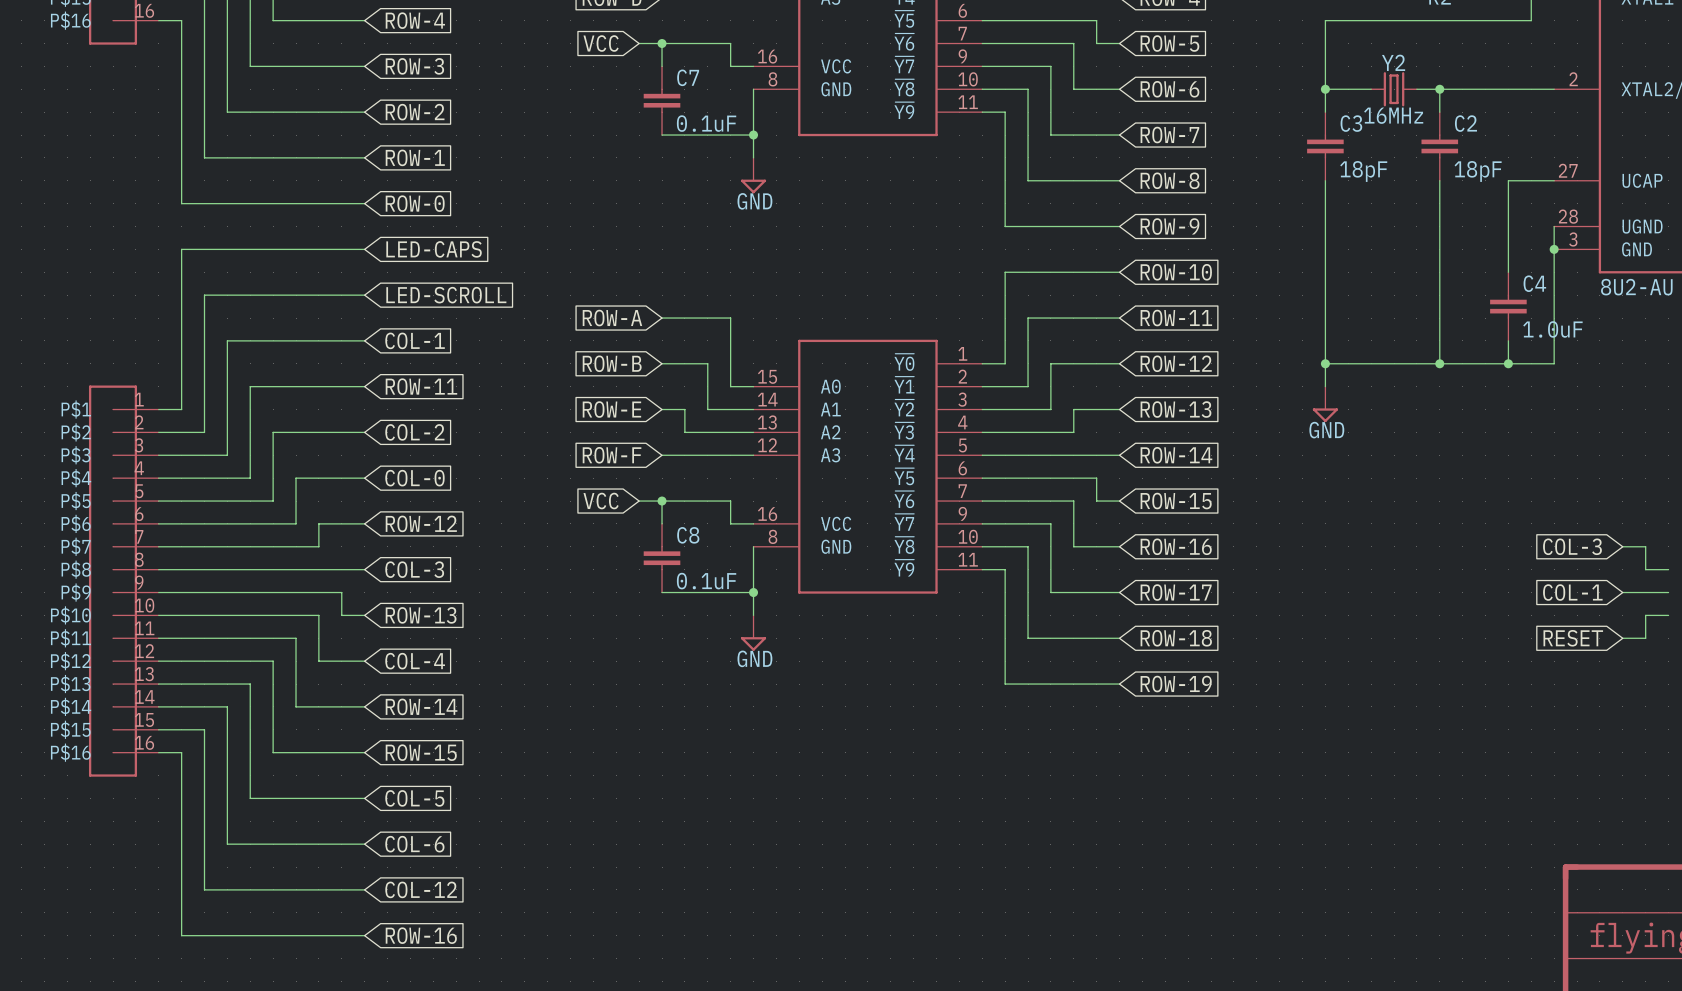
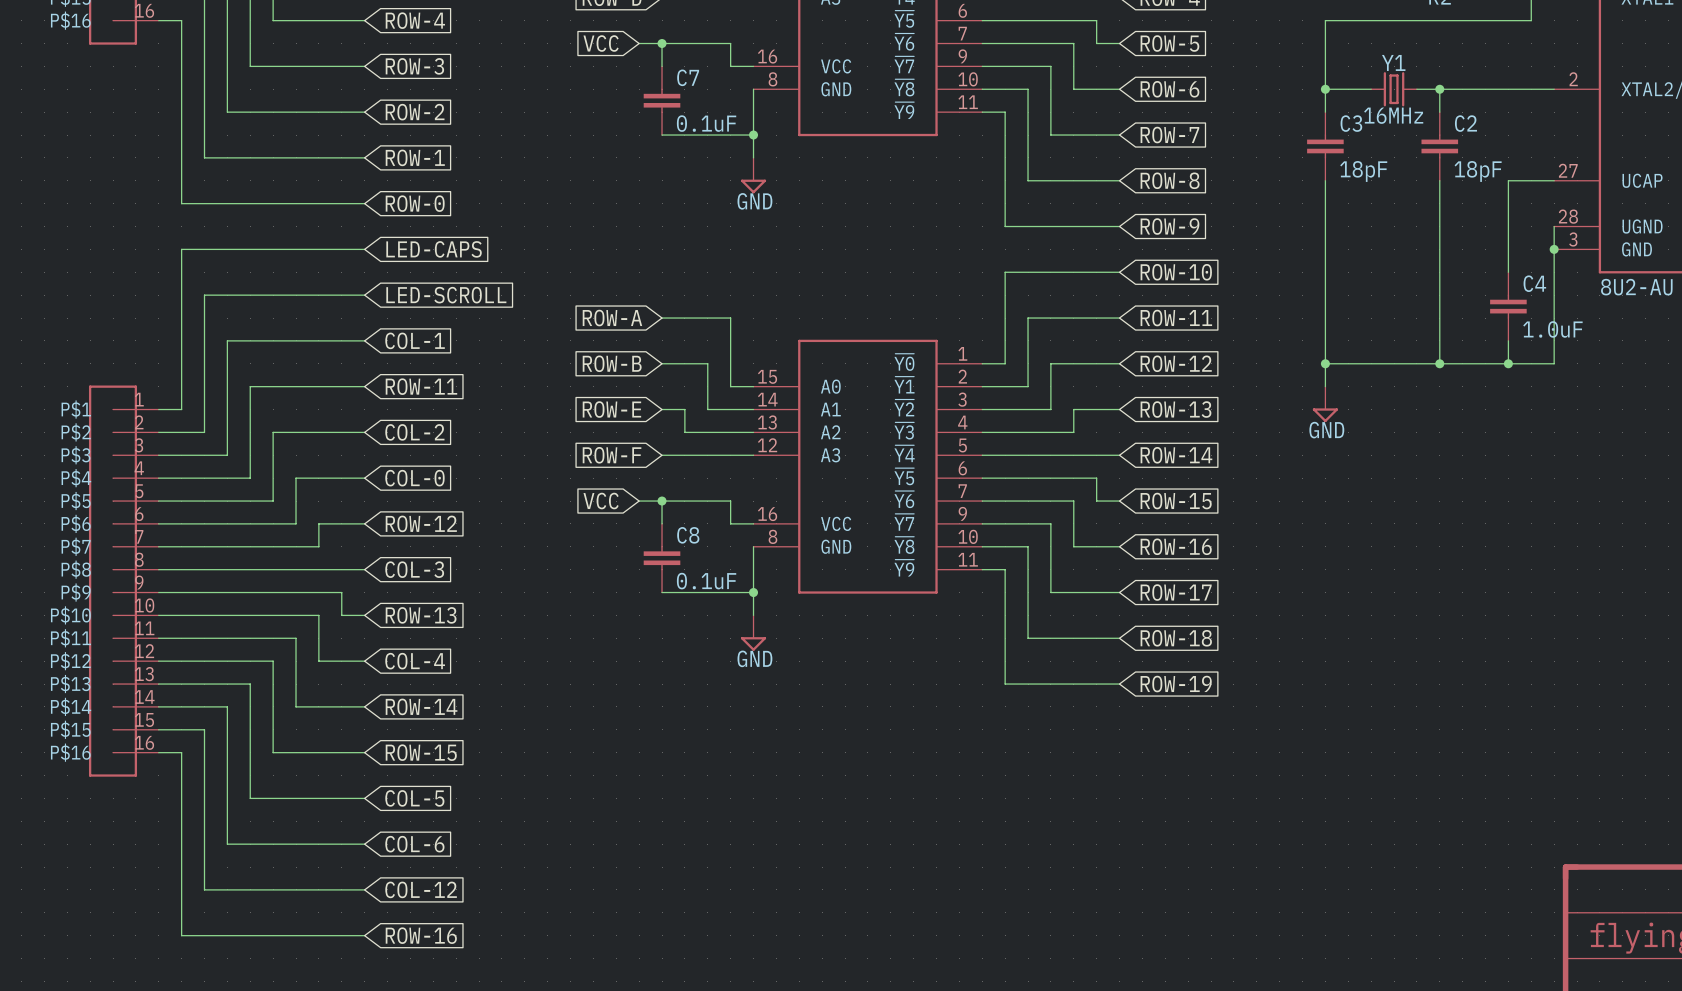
Y2 name: Y2 (1393, 62) -> Y1 (1393, 62)
global label: COL-3 (1572, 546) -> none
wire: (1622, 546) (1645, 546) (1645, 569) (1668, 569) -> none
global label: COL-1 (1572, 592) -> none
wire: (1622, 592) (1668, 592) -> none
wire: (1668, 615) (1645, 615) (1645, 638) (1622, 638) -> none
global label: RESET (1573, 638) -> none

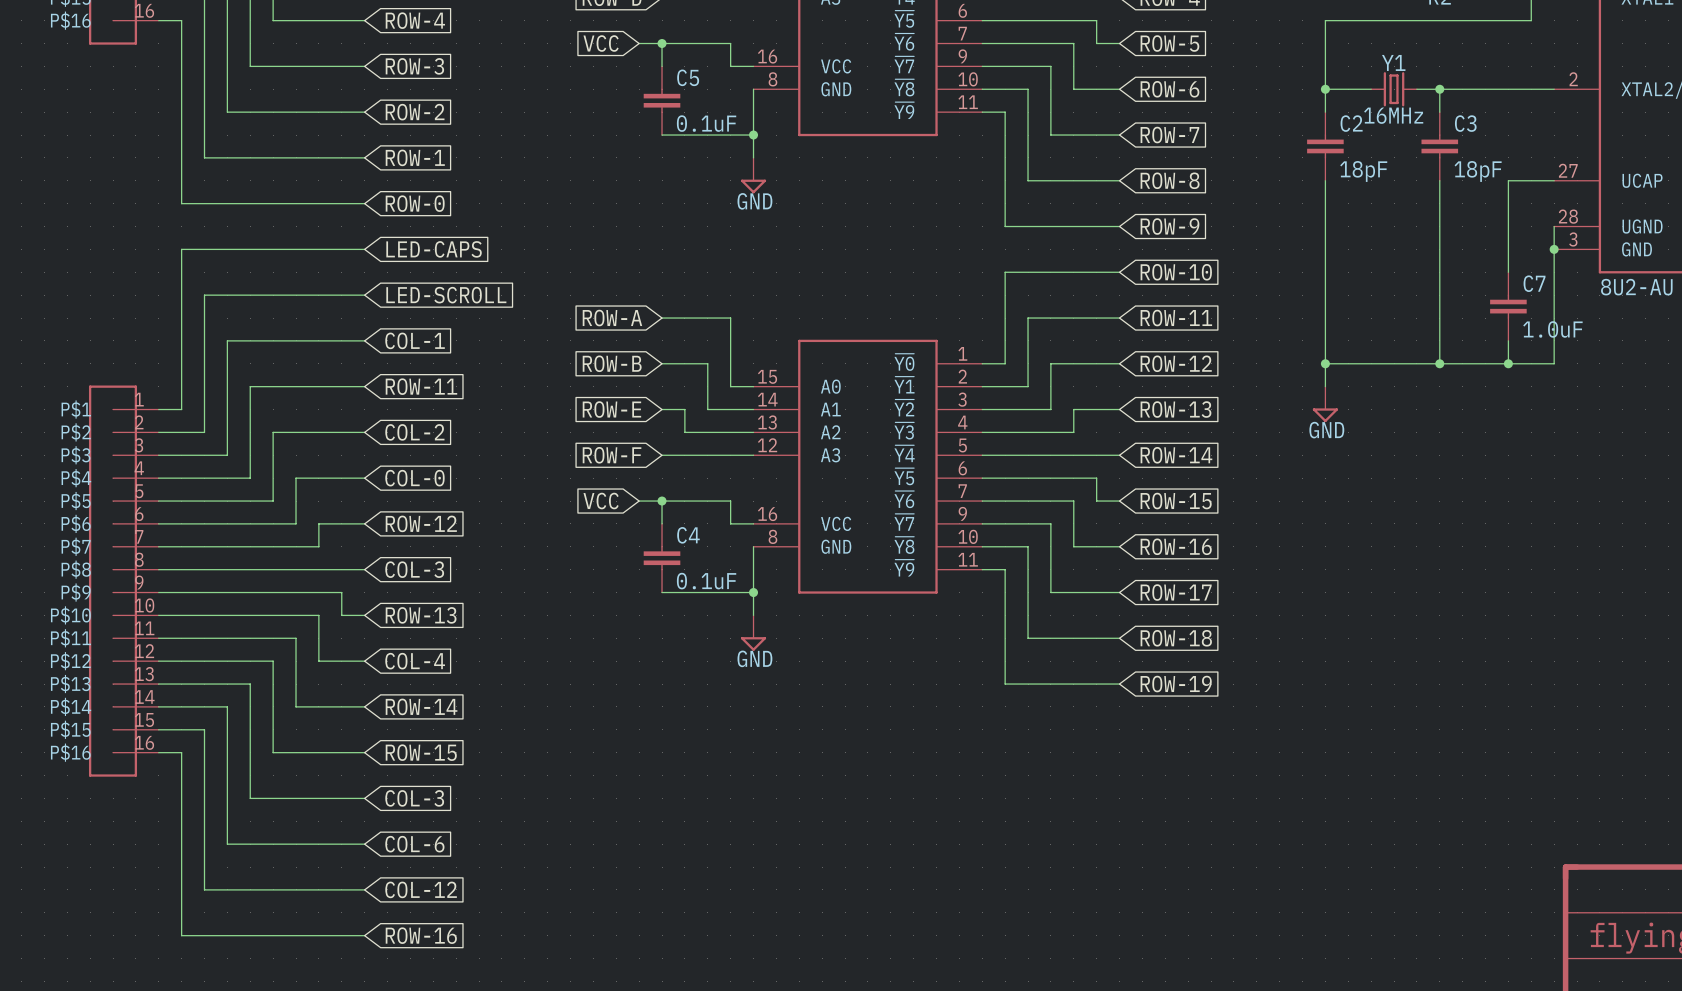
C7 name: C7 (688, 77) -> C5 (688, 77)
C3 name: C3 (1351, 123) -> C2 (1351, 123)
C2 name: C2 (1465, 123) -> C3 (1465, 123)
C4 name: C4 (1534, 283) -> C7 (1534, 283)
C8 name: C8 (688, 535) -> C4 (688, 535)
global label: COL-5 (414, 798) -> COL-3 (414, 798)

